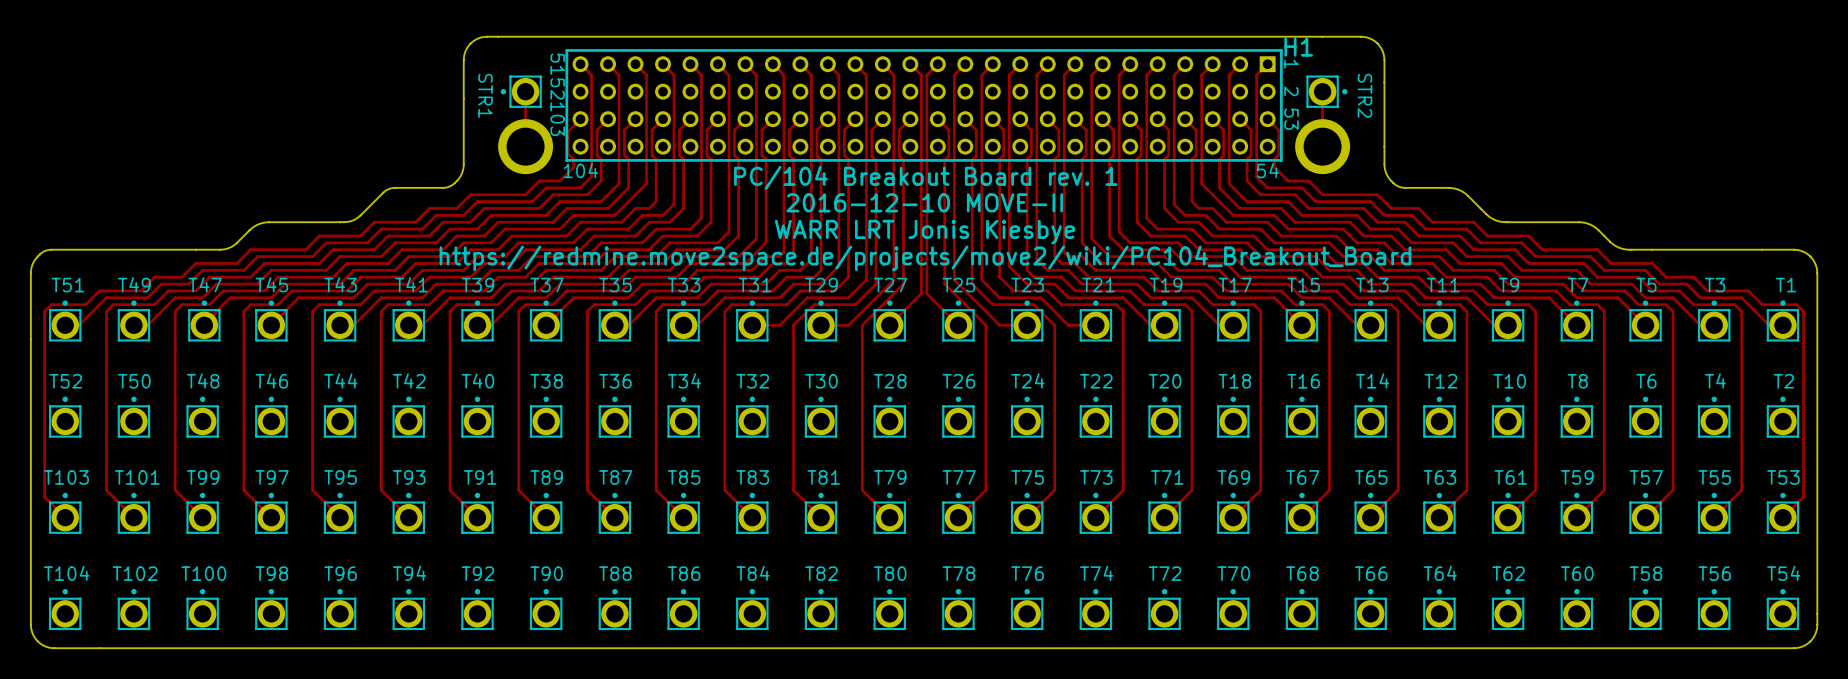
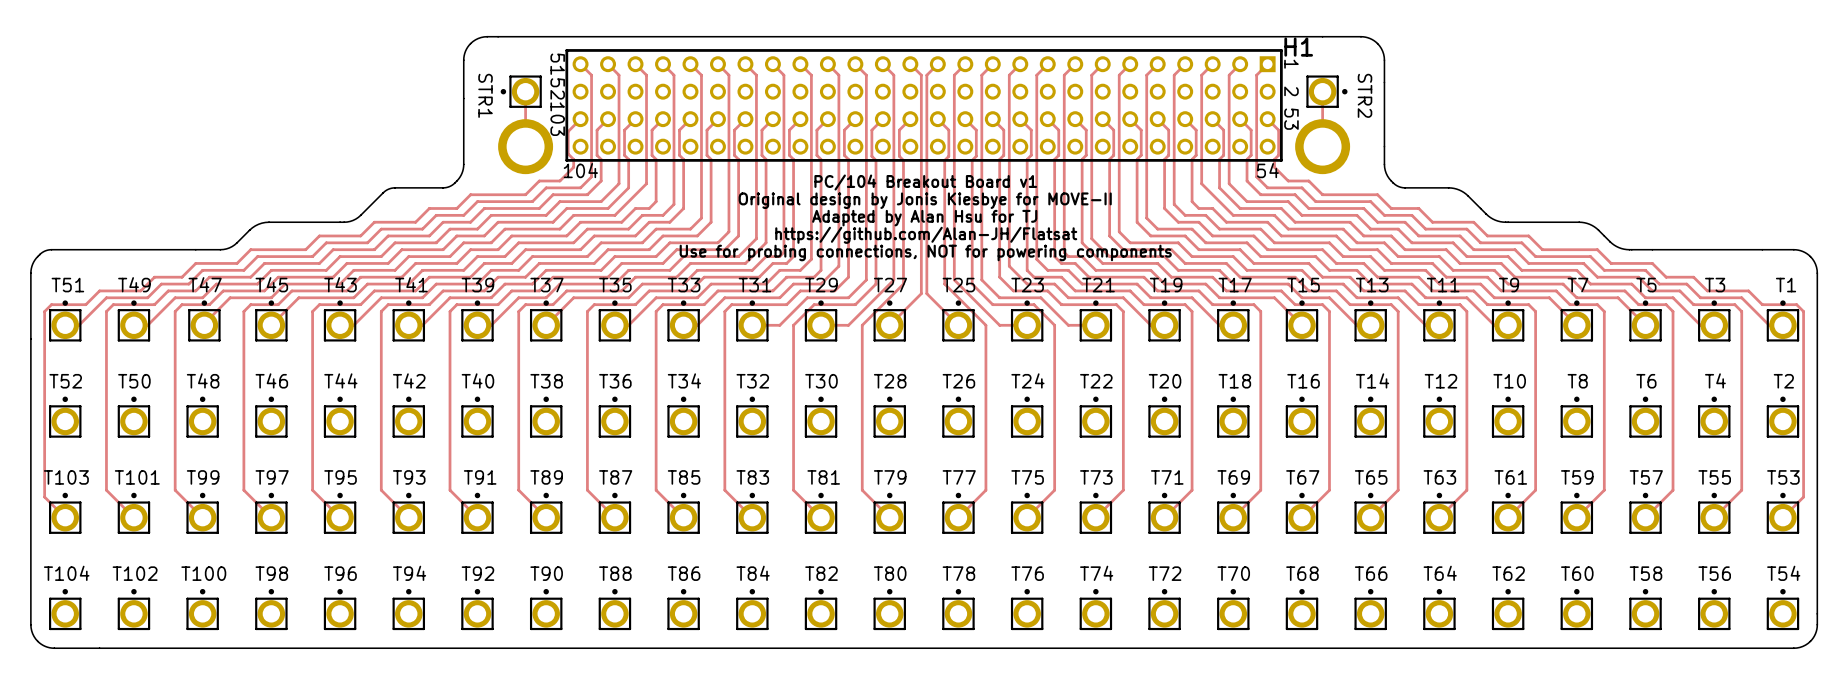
text: PC/104 Breakout Board rev. 1 (925, 177) -> PC/104 Breakout Board v1 (925, 182)
text: 2016-12-10 MOVE-II (924, 202) -> Original design by Jonis Kiesbye for MOVE-II (925, 200)
text: none -> Adapted by Alan Hsu for TJ (924, 218)
text: WARR LRT Jonis Kiesbye (925, 232) -> https://github.com/Alan-JH/Flatsat (926, 235)
text: https://redmine.move2space.de/projects/move2/wiki/PC104_Breakout_Board (925, 258) -> Use for probing connections, NOT for powering components (925, 252)

